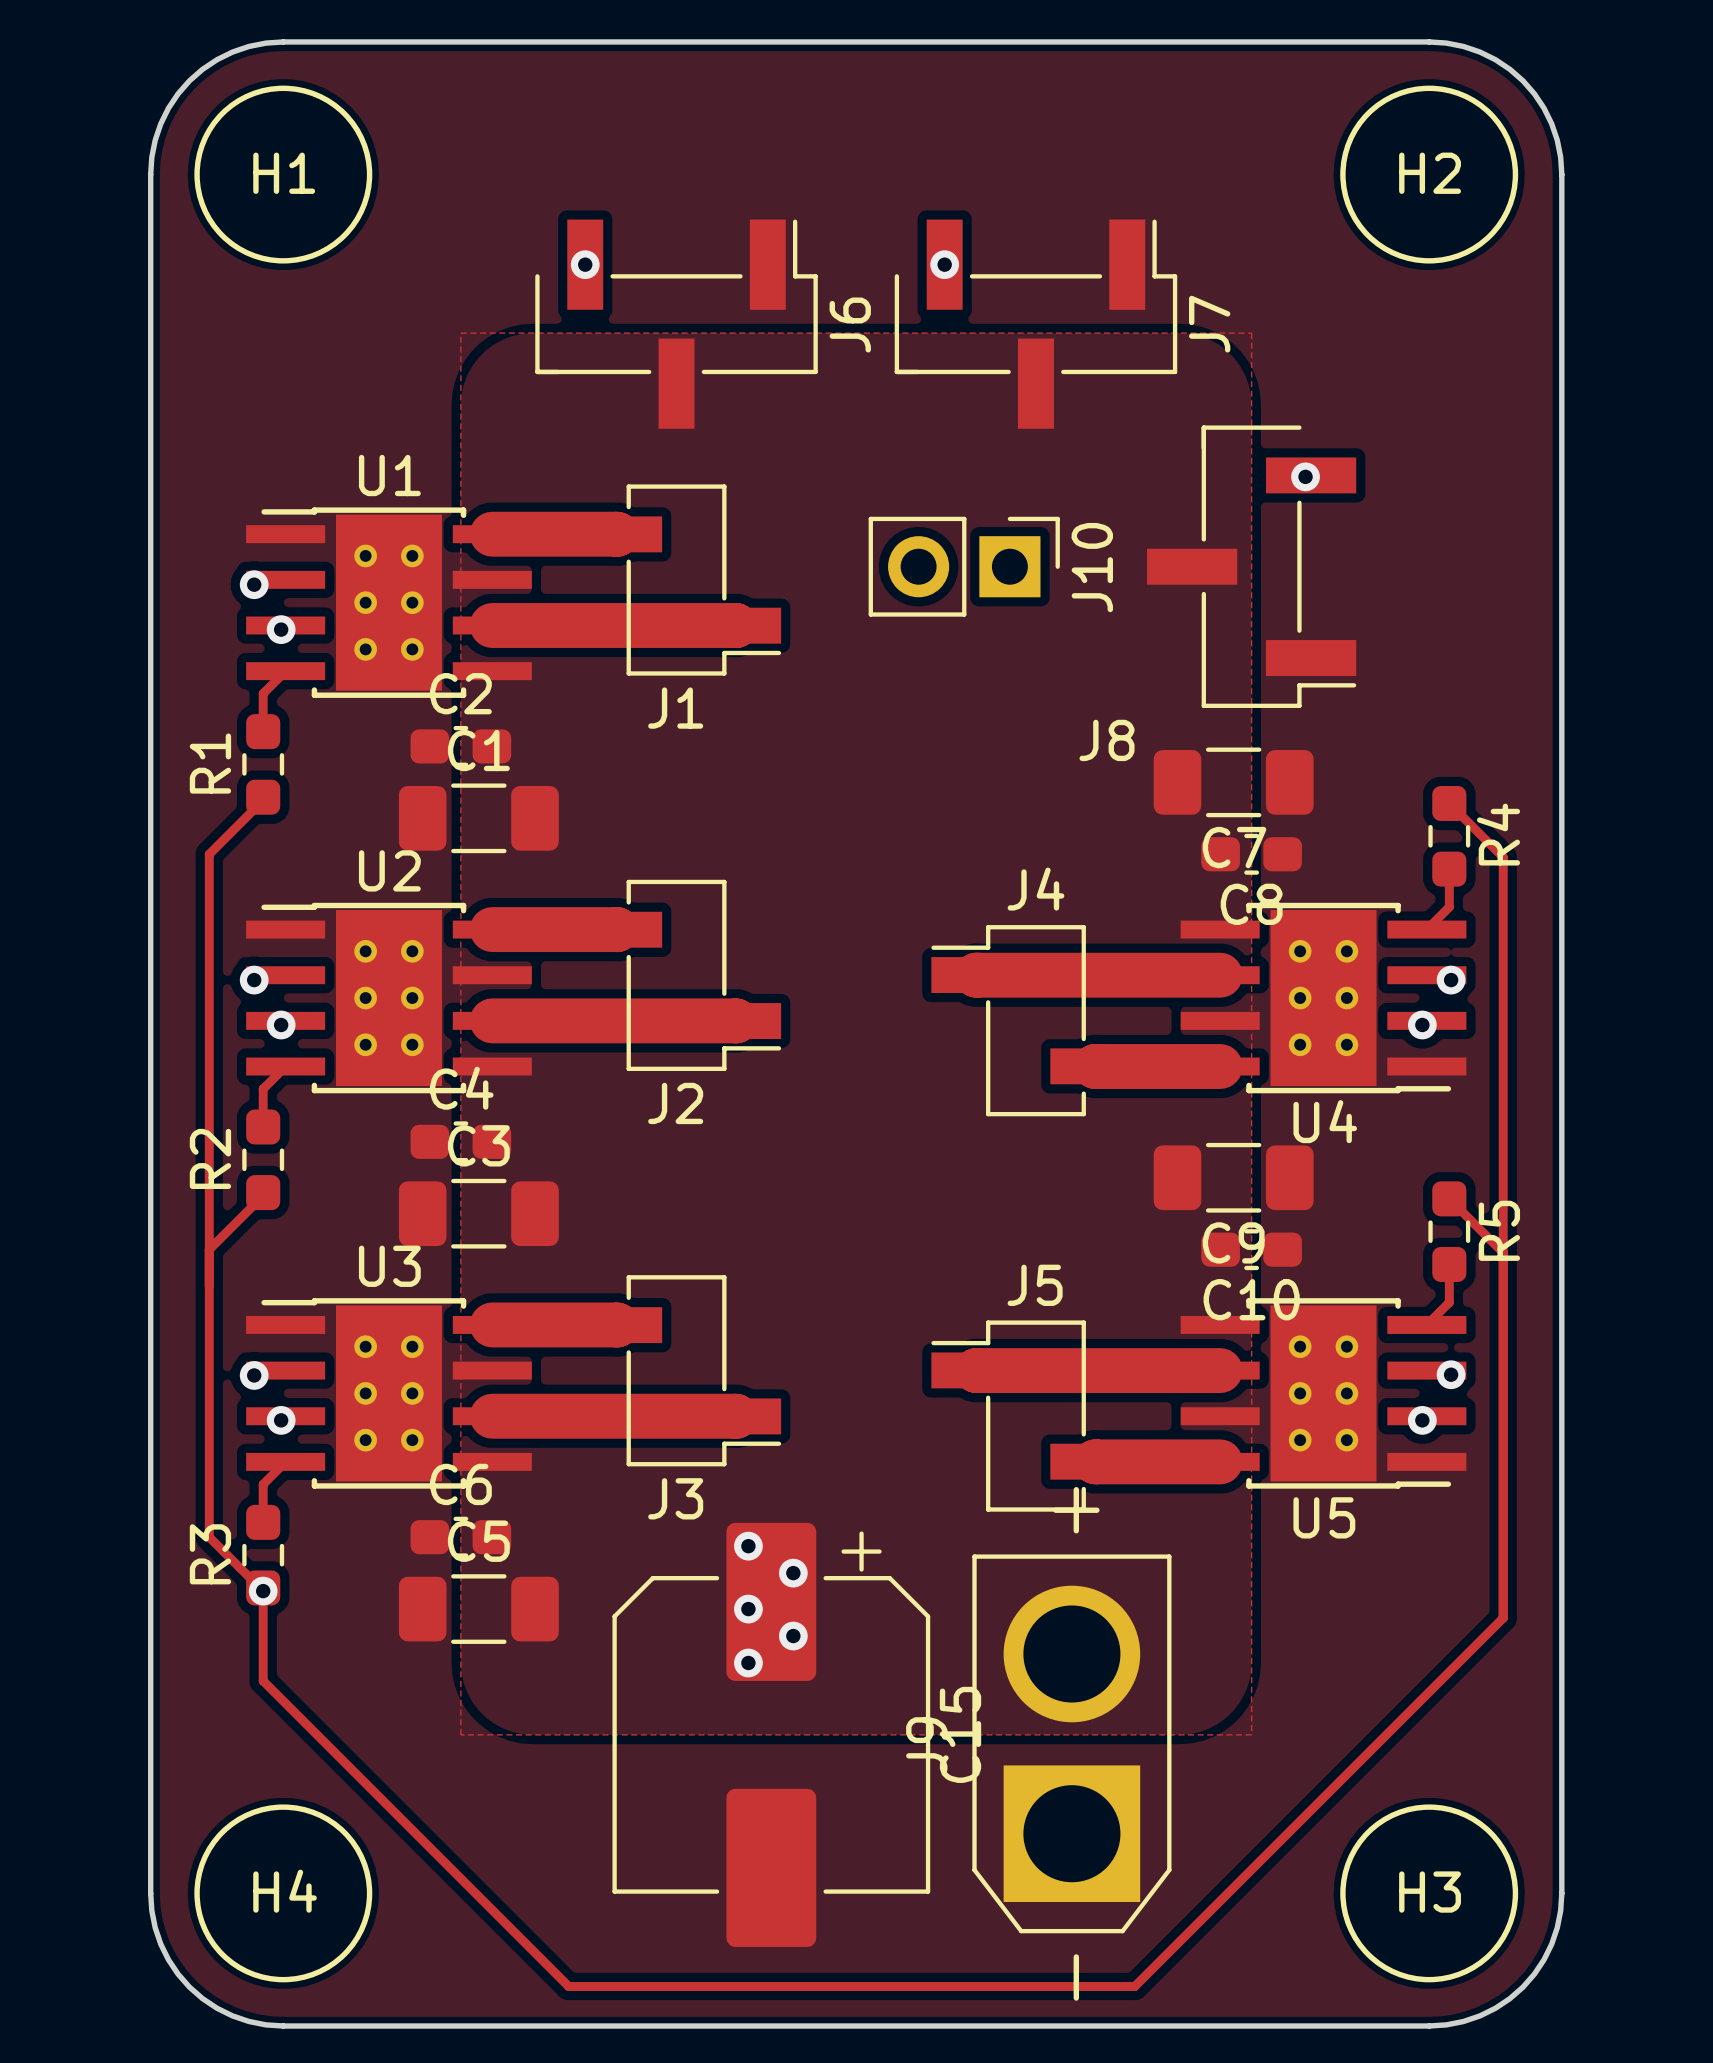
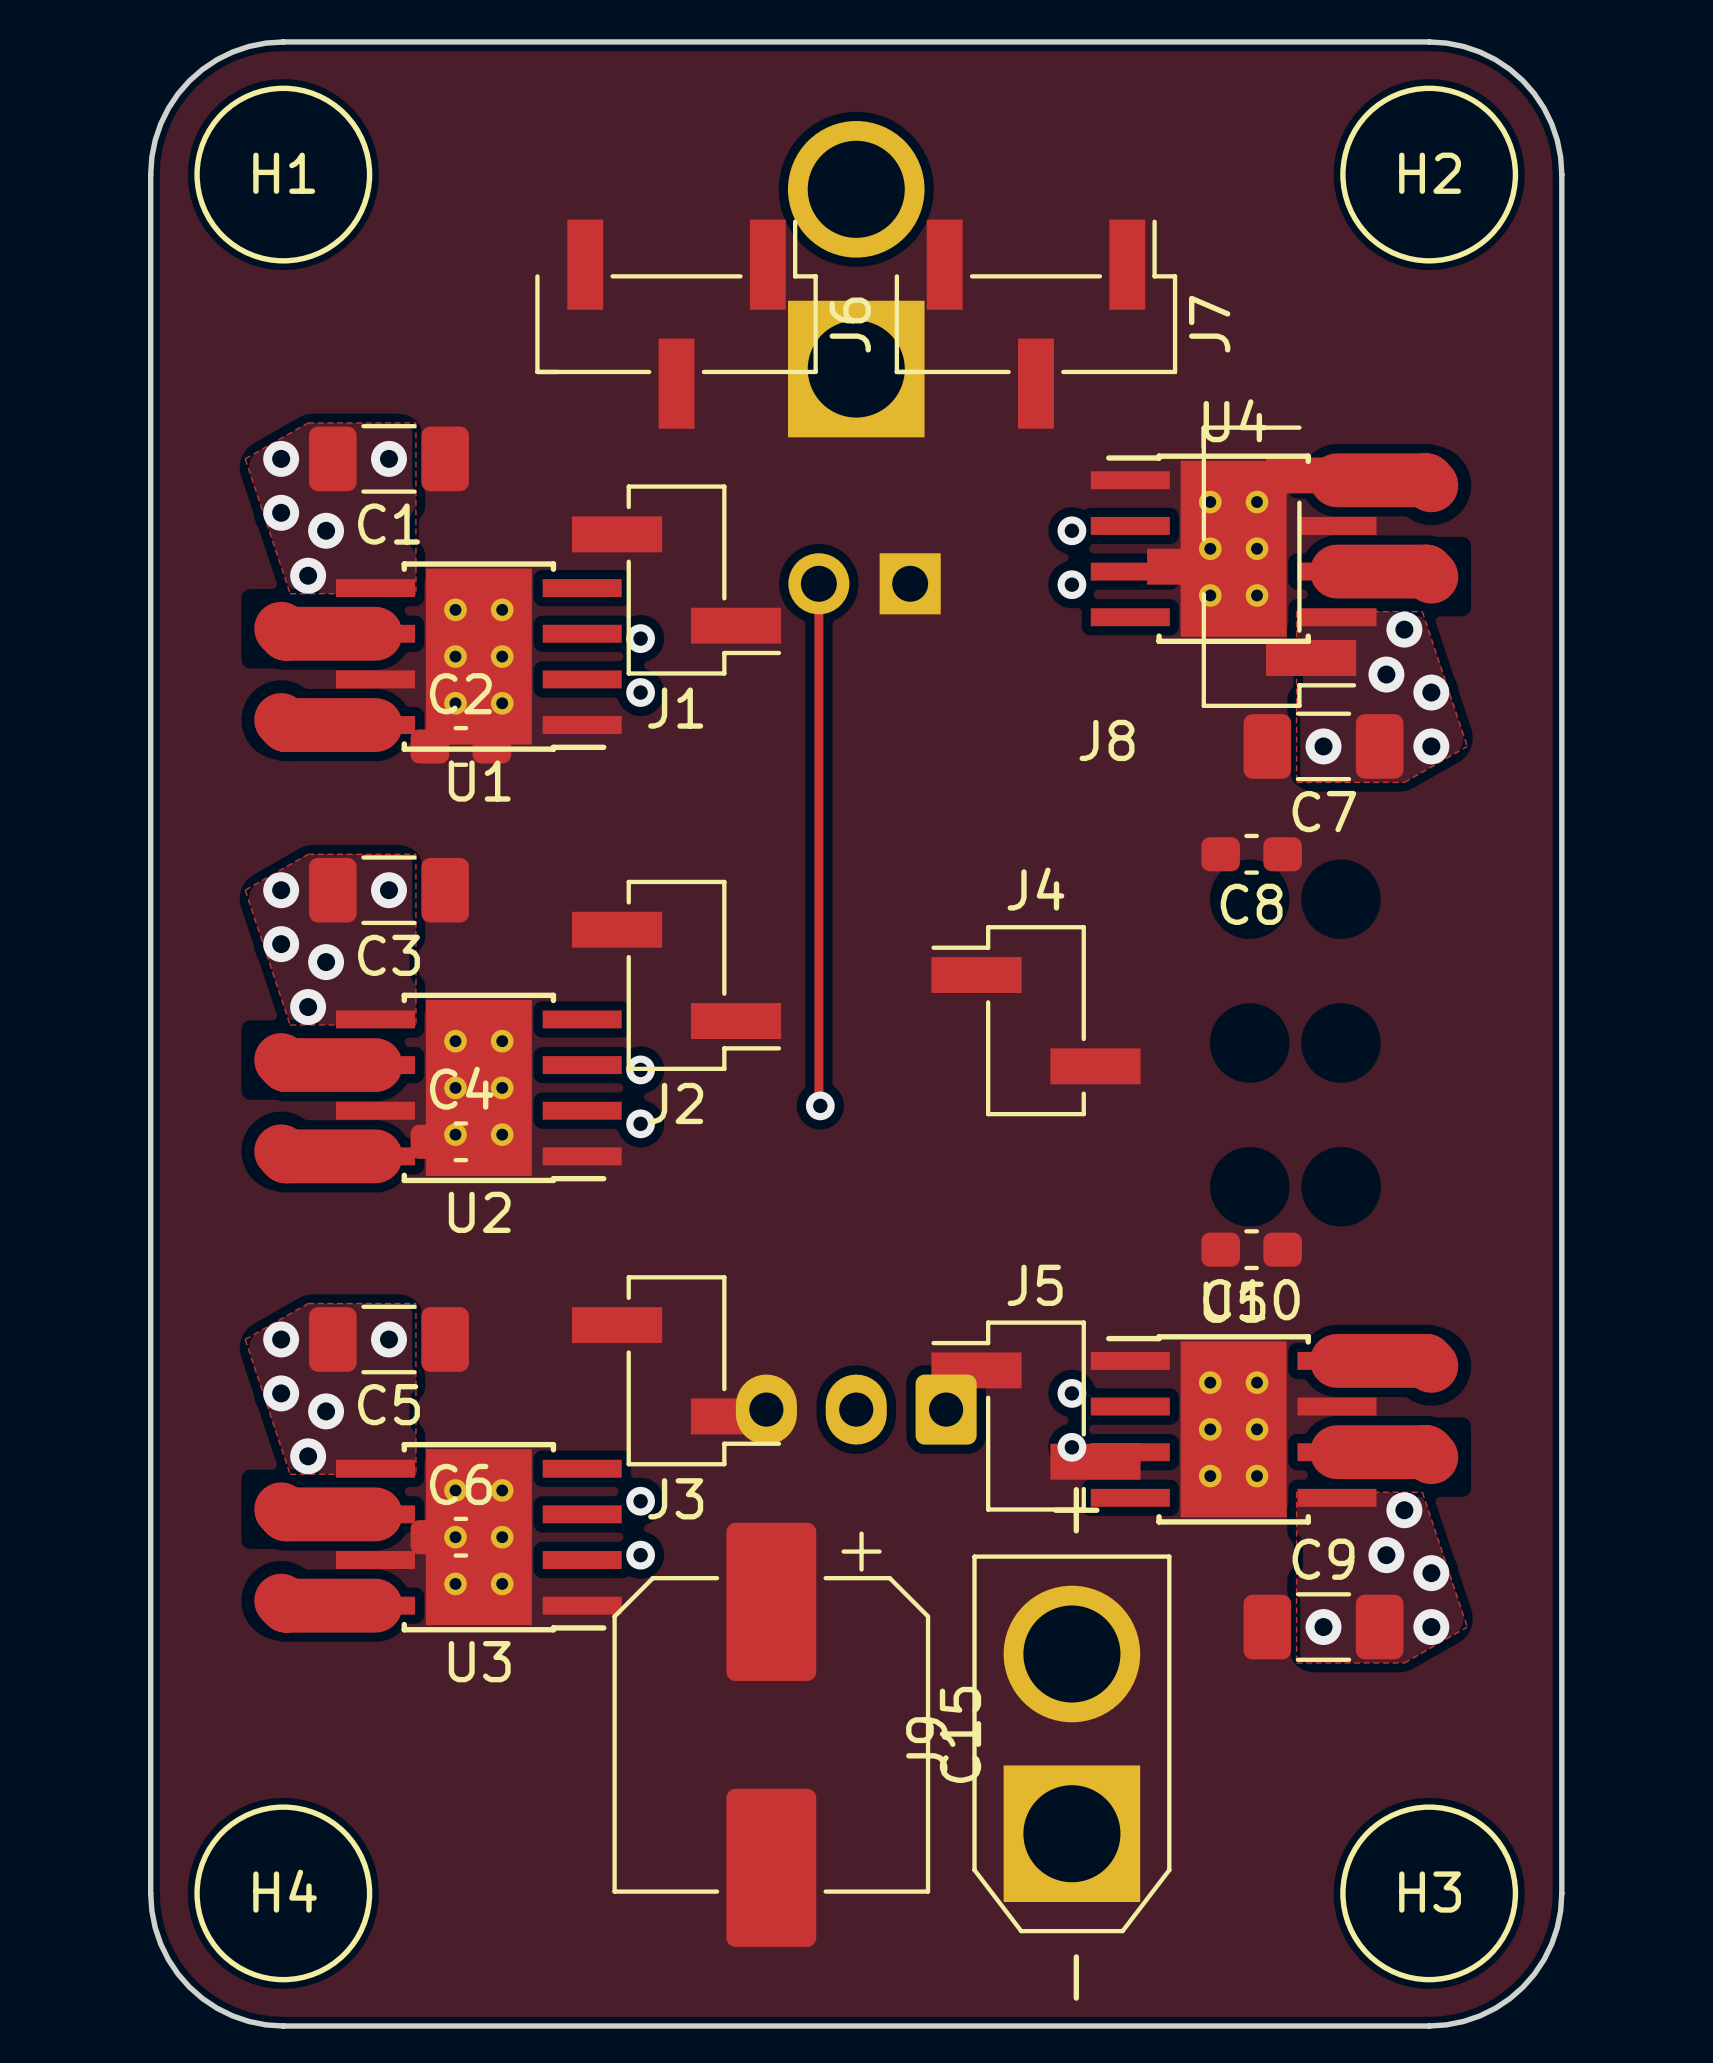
via: (585, 264) -> none
via: (944, 264) -> none
part: none -> (856, 279)
zone outline: (460, 333) (1251, 333) (1251, 1734) (460, 1734) (460, 333) -> none
zone outline: none -> (308, 422) (245, 458) (290, 593) (415, 593) (415, 422) (308, 422)
via: none -> (281, 458)
via: none -> (388, 458)
via: (1305, 476) -> none
track: none -> (1336, 480) (1426, 480) (1431, 485)
via: none -> (281, 512)
via: none -> (326, 530)
via: none -> (1071, 530)
track: (492, 534) (616, 534) -> none
J10 side: top (964, 566) -> bottom (864, 583)
track: none -> (1336, 571) (1426, 571) (1431, 576)
via: none -> (308, 575)
track: none -> (818, 583) (820, 1105)
via: (254, 584) -> none
via: none -> (1071, 584)
U1 rotation: 0° (388, 602) -> 180° (478, 656)
zone outline: none -> (1296, 611) (1296, 782) (1404, 782) (1467, 746) (1422, 611) (1296, 611)
track: (492, 625) (735, 625) -> none
track: none -> (281, 628) (286, 633) (375, 633)
via: (281, 629) -> none
via: none -> (1404, 629)
via: none -> (640, 638)
track: (285, 671) (263, 693) (263, 731) -> none
via: none -> (1386, 674)
via: none -> (640, 692)
via: none -> (1431, 692)
track: none -> (281, 720) (286, 725) (375, 725)
via: none -> (1323, 746)
via: none -> (1431, 746)
C1 name position: C1 (478, 750) -> C1 (388, 524)
R1: (263, 764) -> none
C7 position: (1233, 782) -> (1323, 746)
track: (263, 800) (209, 854) (209, 1537) (263, 1591) (263, 1680) (568, 1986) (1134, 1986) (1503, 1618) (1503, 857) (1449, 803) -> none
C1 position: (478, 818) -> (388, 458)
R4: (1449, 836) -> none
zone outline: none -> (308, 854) (245, 890) (290, 1025) (415, 1025) (415, 854) (308, 854)
track: (1449, 869) (1449, 907) (1426, 929) -> none
via: none -> (281, 890)
via: none -> (388, 890)
track: (492, 929) (616, 929) -> none
via: none -> (281, 944)
via: none -> (326, 962)
track: (976, 975) (1220, 975) -> none
via: (254, 980) -> none
via: (1451, 980) -> none
U2 rotation: 0° (388, 998) -> 180° (478, 1087)
U4 rotation: 0° (1323, 998) -> 180° (1233, 548)
U4 position: (1323, 998) -> (1233, 548)
track: (492, 1020) (735, 1020) -> none
via position: (281, 1025) -> (308, 1007)
via: (1422, 1025) -> none
track: none -> (281, 1060) (286, 1065) (375, 1065)
track: (285, 1066) (263, 1088) (263, 1126) -> none
track: (1095, 1066) (1220, 1066) -> none
via: none -> (640, 1069)
via: none -> (820, 1105)
via: none -> (640, 1123)
C3 name position: C3 (478, 1145) -> C3 (388, 955)
track: none -> (281, 1151) (286, 1156) (375, 1156)
R2: (263, 1159) -> none
C9 position: (1233, 1177) -> (1323, 1627)
track: (263, 1195) (209, 1249) -> none
track: (1449, 1198) (1503, 1252) -> none
C3 position: (478, 1213) -> (388, 890)
R5: (1449, 1231) -> none
C9 name position: C9 (1233, 1242) -> C9 (1323, 1559)
track: (1449, 1264) (1449, 1302) (1426, 1324) -> none
zone outline: none -> (308, 1303) (245, 1339) (290, 1474) (415, 1474) (415, 1303) (308, 1303)
track: (492, 1324) (616, 1324) -> none
via: none -> (281, 1339)
via: none -> (388, 1339)
track: none -> (1336, 1360) (1426, 1360) (1431, 1365)
track: (976, 1370) (1220, 1370) -> none
via: (1451, 1374) -> none
via: (254, 1375) -> none
via: none -> (281, 1393)
U3 rotation: 0° (388, 1393) -> 180° (478, 1537)
via: none -> (1071, 1393)
U5 rotation: 0° (1323, 1393) -> 180° (1233, 1429)
part: none -> (856, 1409)
via: none -> (326, 1411)
track: (492, 1416) (735, 1416) -> none
via: (281, 1420) -> none
via: (1422, 1420) -> none
via: none -> (1071, 1447)
track: none -> (1336, 1452) (1426, 1452) (1431, 1457)
via: none -> (308, 1456)
track: (285, 1461) (263, 1484) (263, 1522) -> none
track: (1095, 1461) (1220, 1461) -> none
zone outline: none -> (1296, 1492) (1422, 1492) (1467, 1627) (1404, 1662) (1296, 1662) (1296, 1492)
via: none -> (640, 1501)
track: none -> (281, 1509) (286, 1514) (375, 1514)
via: none -> (1404, 1510)
C5 name position: C5 (478, 1541) -> C5 (388, 1404)
via: (748, 1546) -> none
R3: (263, 1555) -> none
via: none -> (640, 1555)
via: none -> (1386, 1555)
via: (793, 1573) -> none
via: none -> (1431, 1573)
via: (263, 1591) -> none
track: none -> (281, 1600) (286, 1605) (375, 1605)
C5 position: (478, 1609) -> (388, 1339)
via: (748, 1609) -> none
via: none -> (1323, 1627)
via: none -> (1431, 1627)
via: (793, 1636) -> none
via: (748, 1662) -> none

